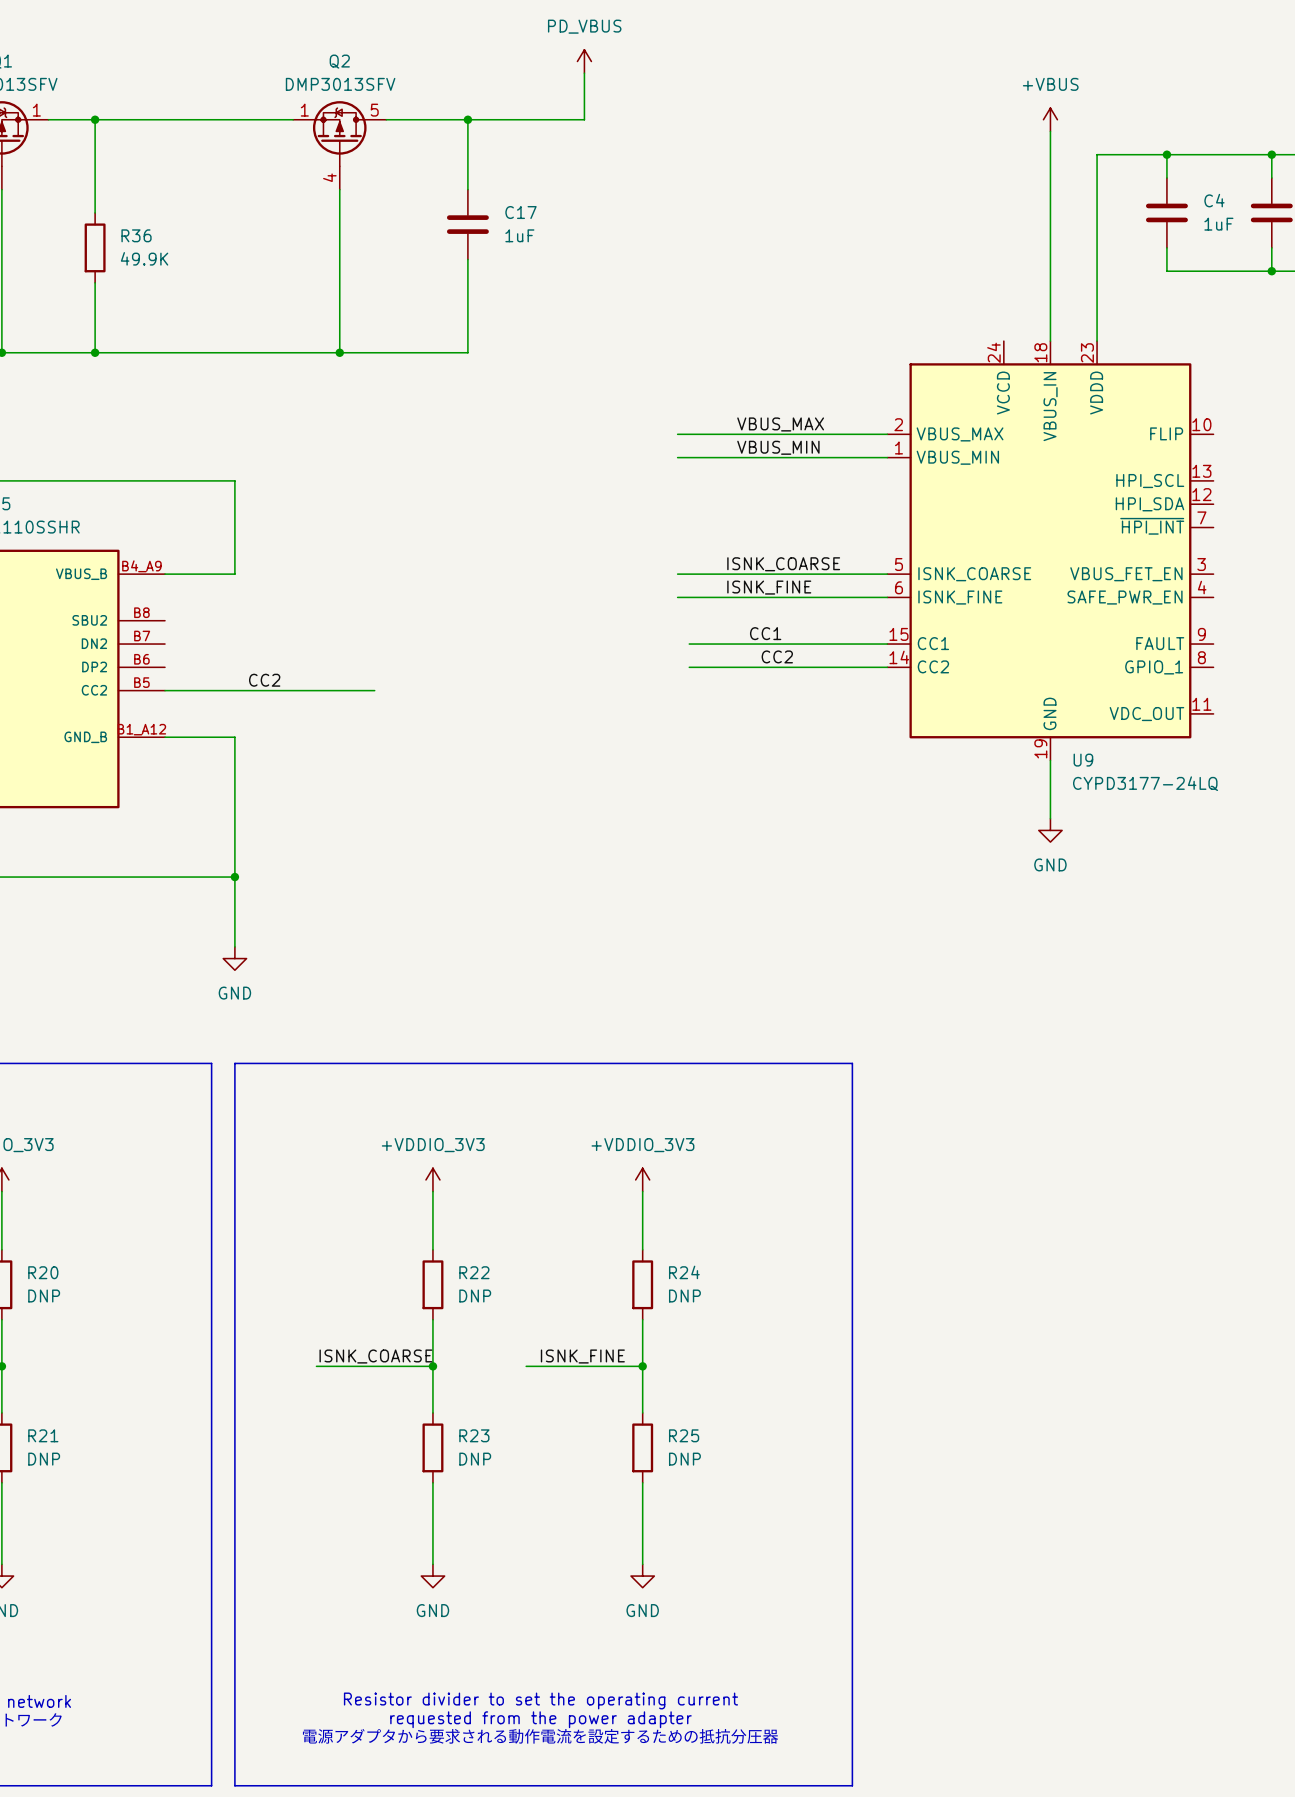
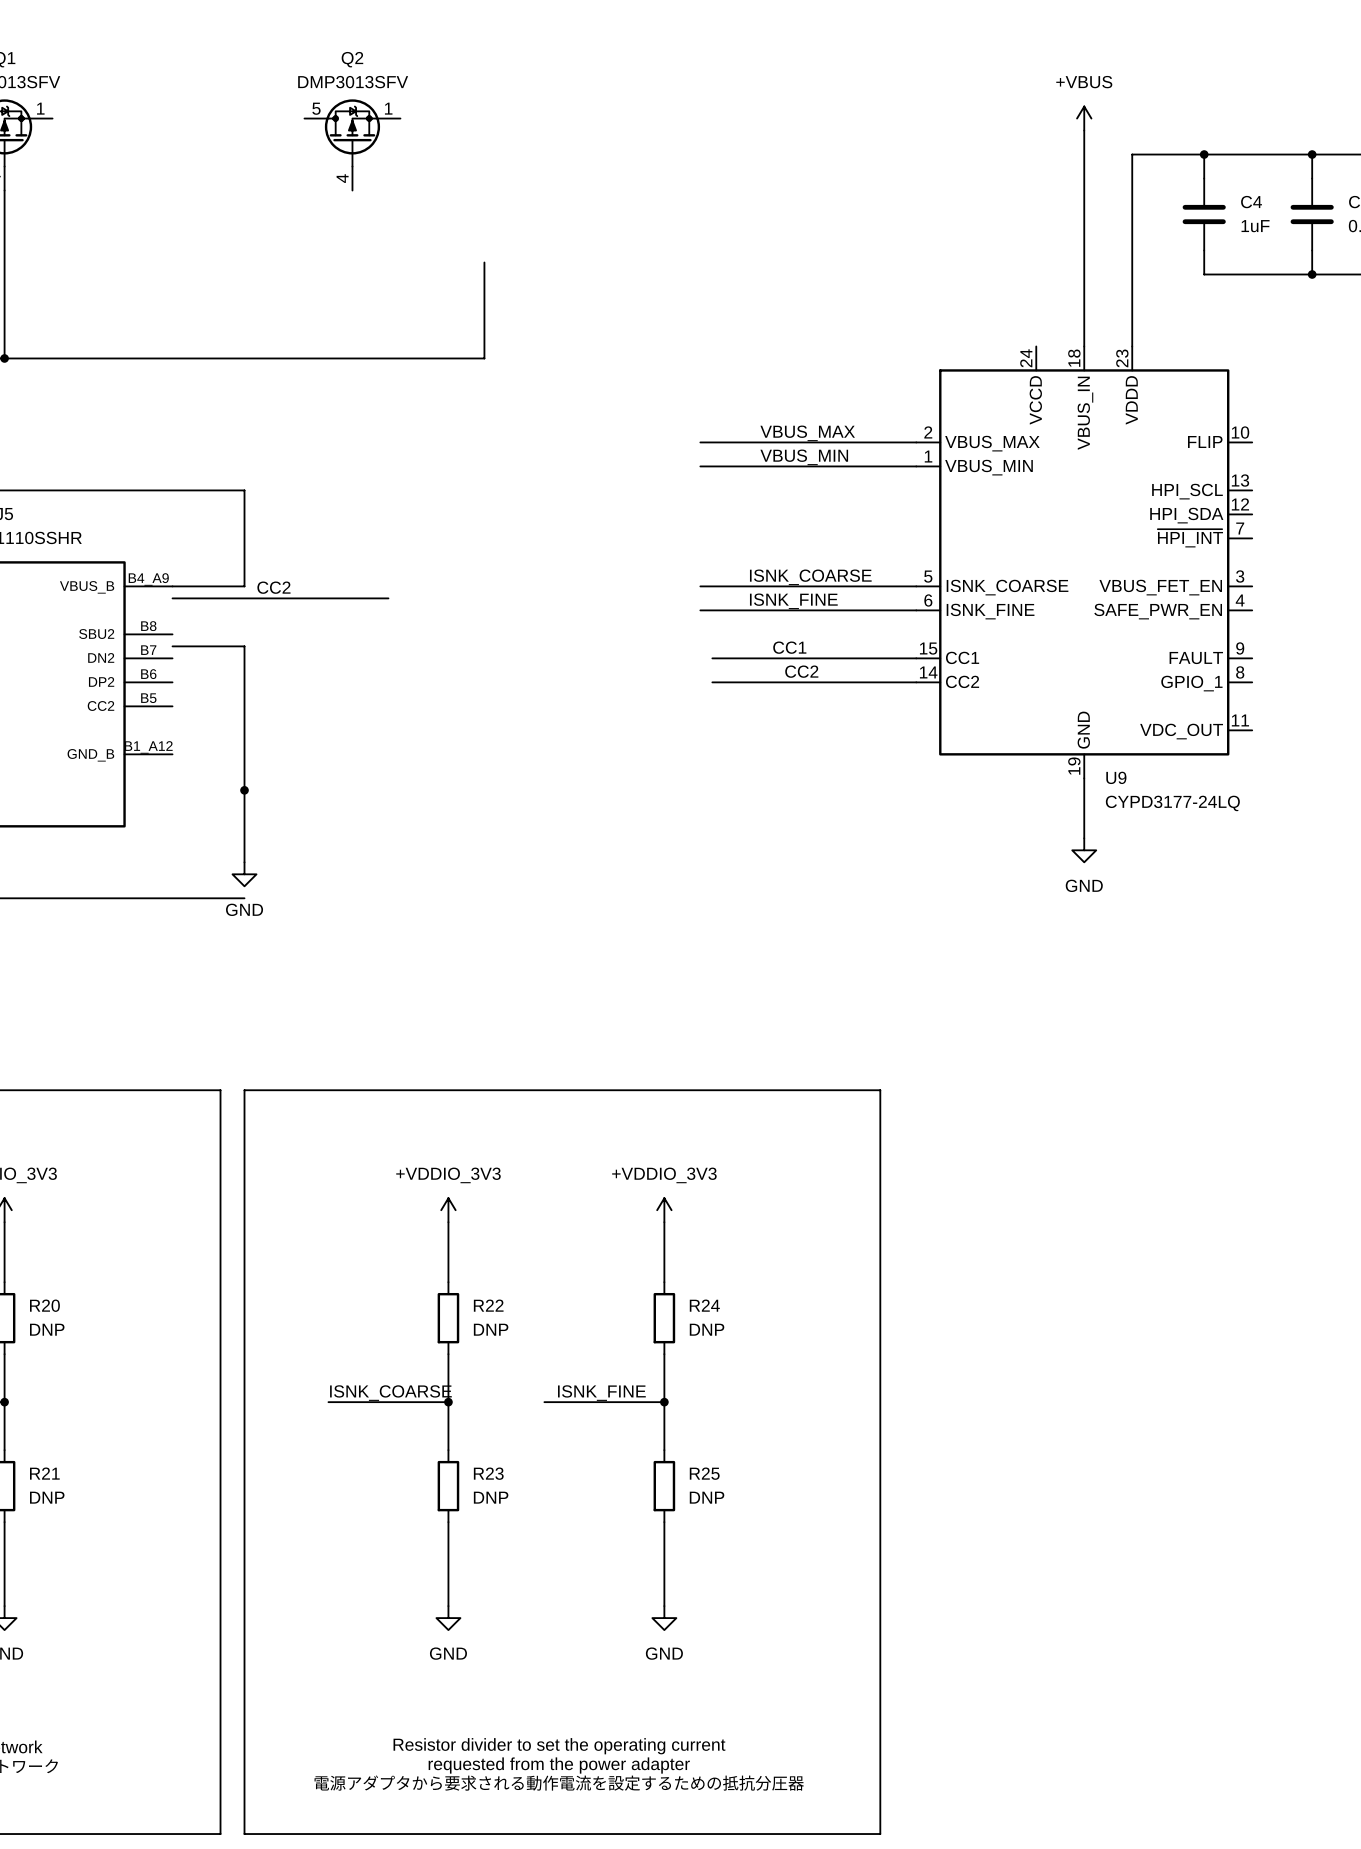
power symbol: PD_VBUS (584, 61) -> none
wire: (584, 73) (584, 119) (386, 119) -> none
wire: (48, 119) (293, 119) -> none
wire: (95, 119) (95, 212) -> none
junction: (95, 119) -> none
wire: (467, 119) (467, 189) -> none
junction: (467, 119) -> none
Q2 flip: as is (339, 133) -> left-right (352, 132)
wire: (339, 189) (339, 352) -> none
C17: 1uF (467, 224) -> none
R36: 49.9K (95, 247) -> none
wire: (95, 282) (95, 352) -> none
junction: (95, 352) -> none
junction: (339, 352) -> none
label position: CC2 (264, 680) -> CC2 (273, 587)
wire: (165, 690) (374, 690) -> (172, 598) (388, 598)
wire: (165, 737) (234, 737) -> (172, 646) (244, 646) (244, 754)
junction: none -> (244, 790)
wire: (234, 842) (234, 946) -> none
junction: (234, 877) -> none
power symbol position: GND (234, 958) -> GND (244, 874)

